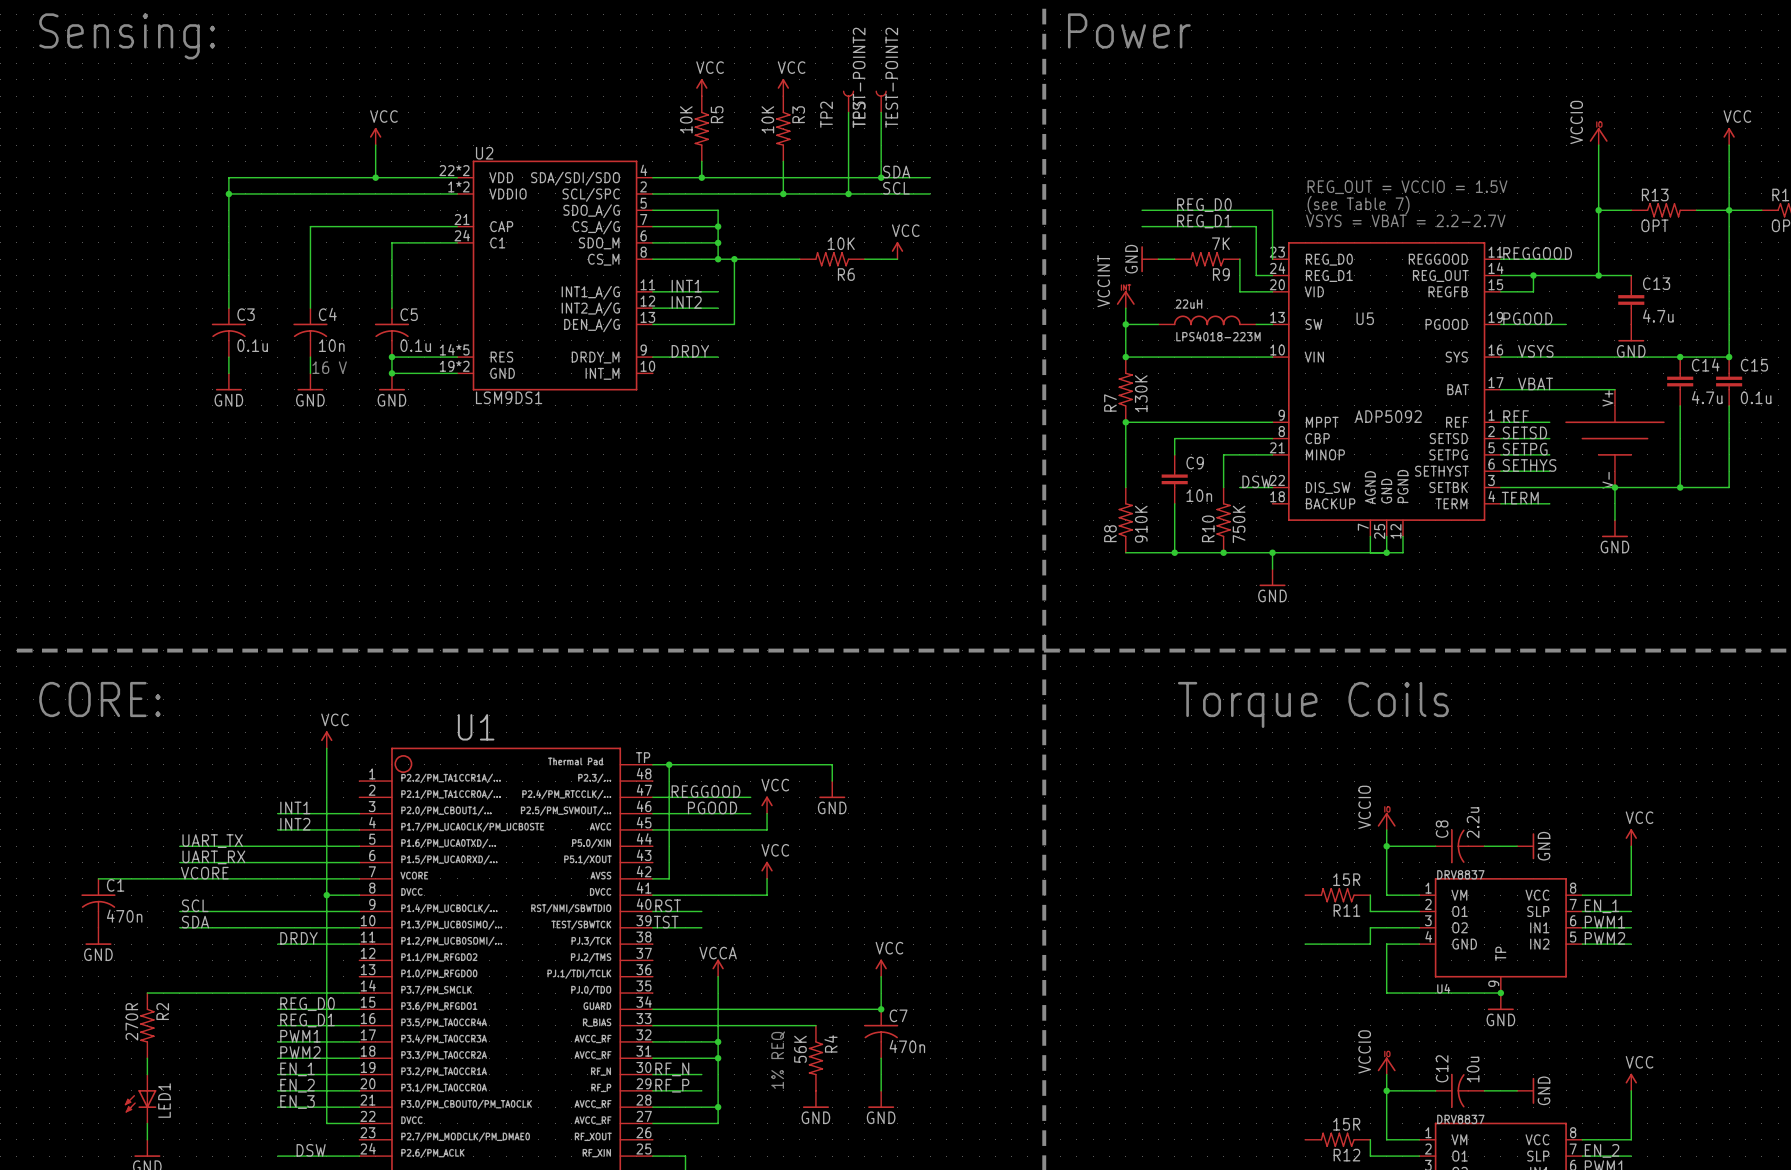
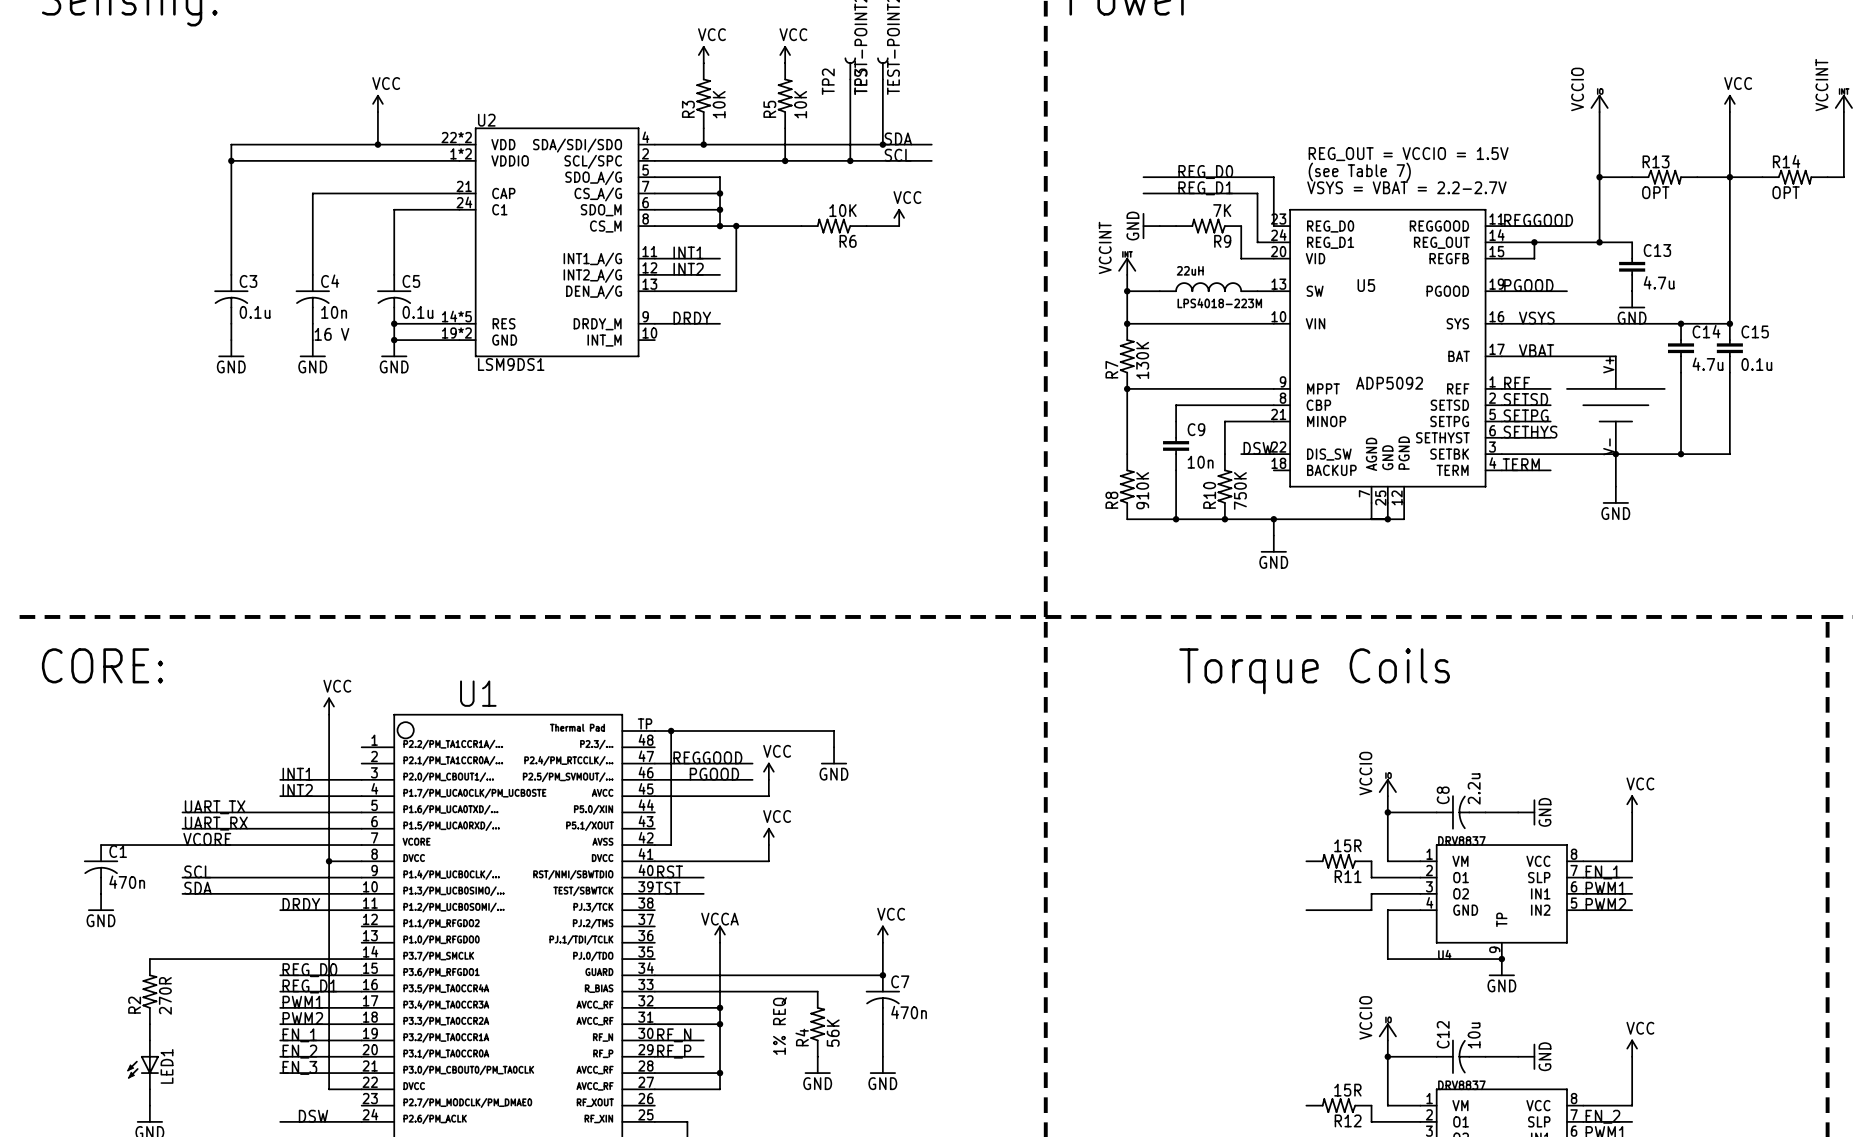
R5 rotation: 0° (701, 128) -> 180° (785, 95)
R5 position: (701, 128) -> (785, 95)
R3 rotation: 0° (783, 128) -> 180° (703, 95)
R3 position: (783, 128) -> (703, 95)
R2 rotation: 0° (147, 1025) -> 180° (149, 991)
R4 rotation: 0° (815, 1058) -> 180° (817, 1024)

